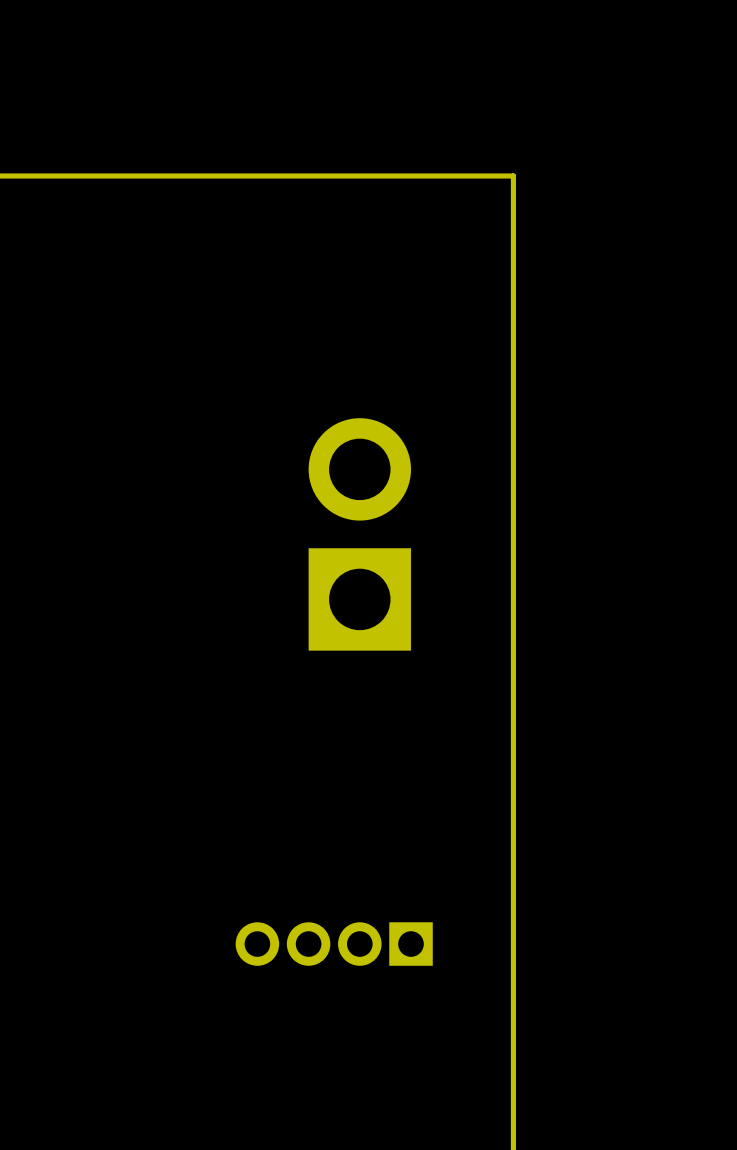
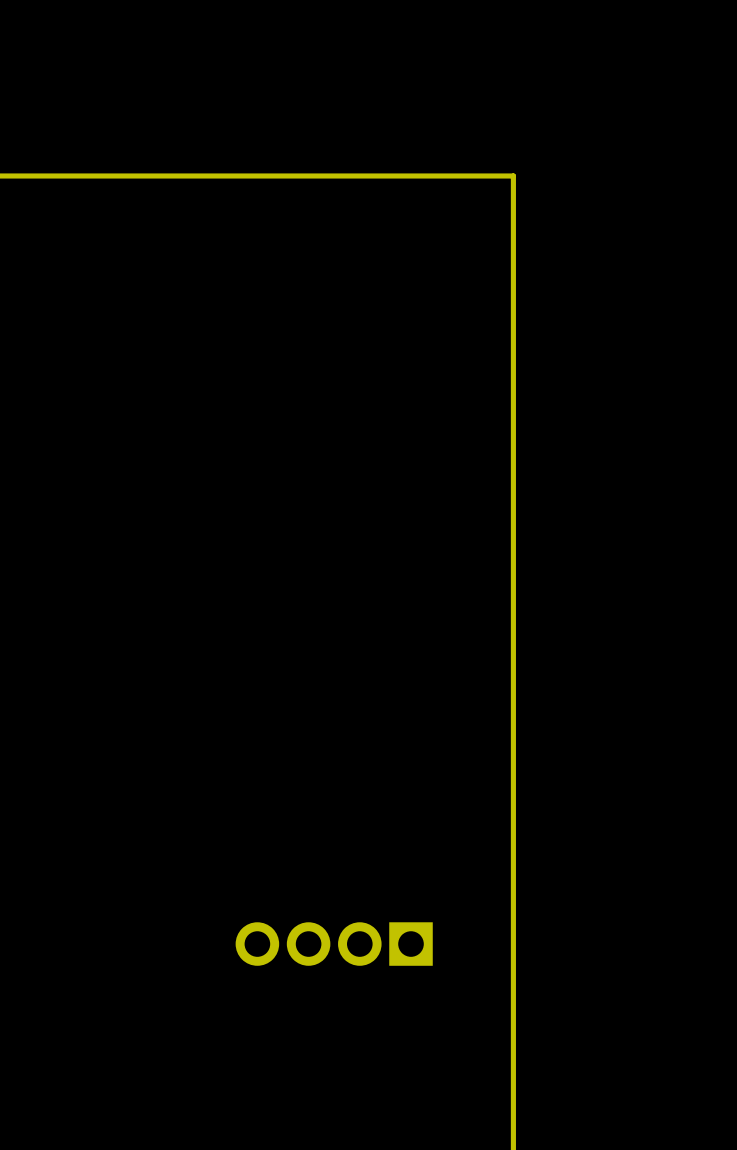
part: (359, 534) -> none

